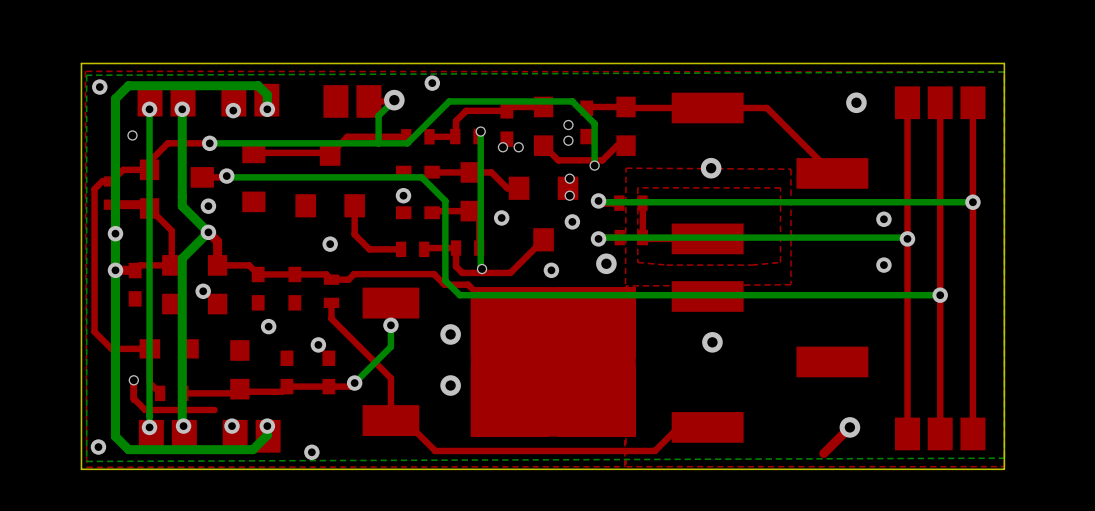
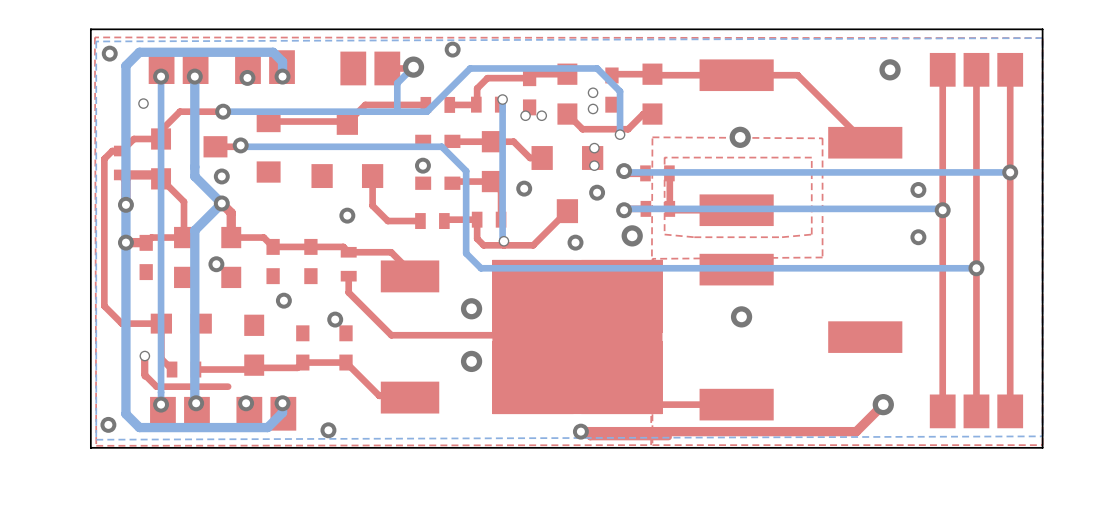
top track: (348, 279) (354, 274) (433, 274) (444, 284) (468, 284) (545, 361) (553, 361) -> (366, 252) (391, 252) (413, 274)
bottom track: (390, 325) (390, 346) (354, 383) -> none
via: (390, 325) -> none
top track: (372, 360) (390, 378) (390, 420) (404, 420) (435, 450) (654, 450) (678, 427) -> (391, 335) (581, 335)
top track: (354, 383) (351, 386) (328, 386) -> (413, 395) (379, 395) (346, 362)
via: (354, 383) -> none
top track: none -> (706, 404) (650, 404)
via: none -> (580, 431)
top track: none -> (856, 431) (580, 431) (584, 431) (590, 437) (668, 437)

